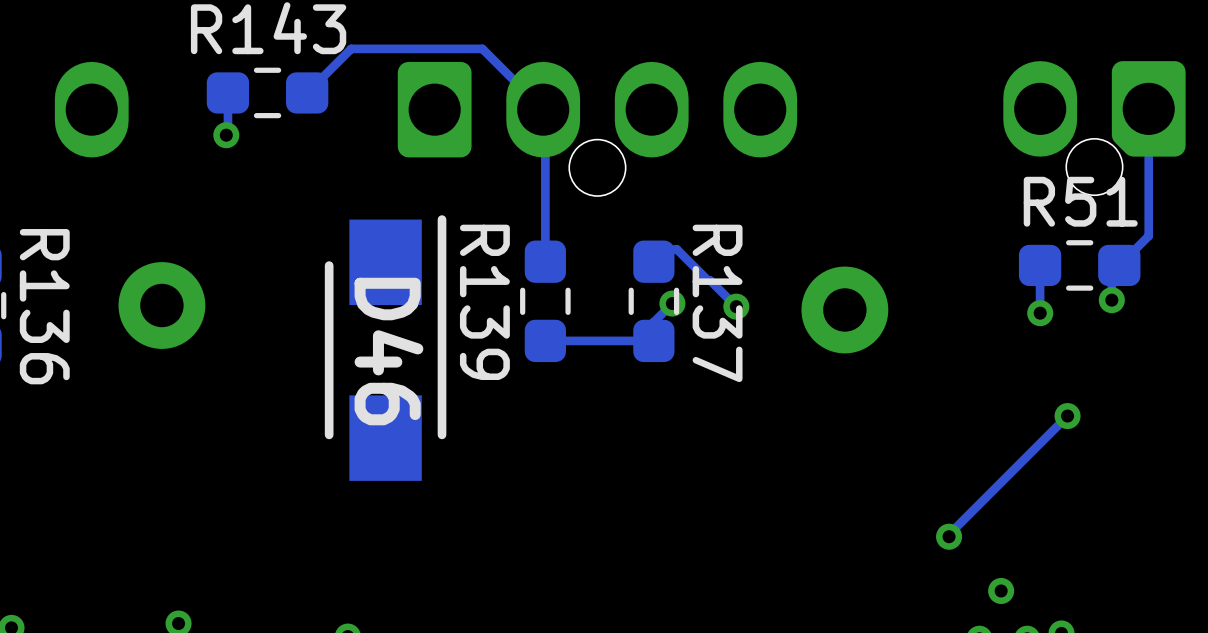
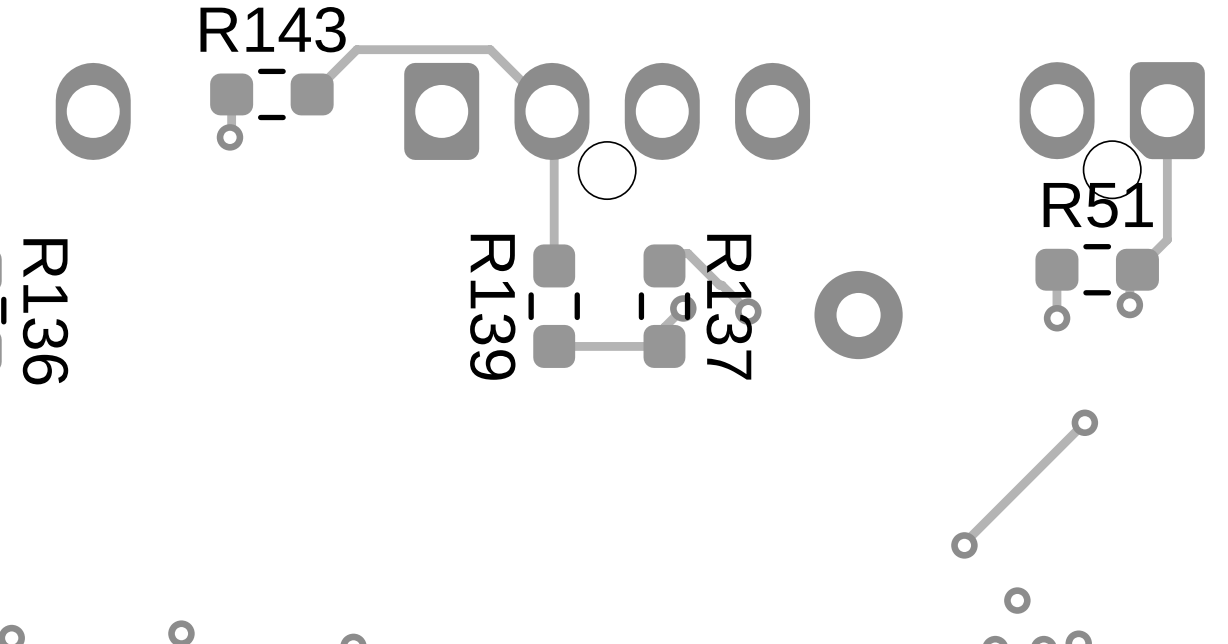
part: (161, 305) -> none
D46: (385, 348) -> none

